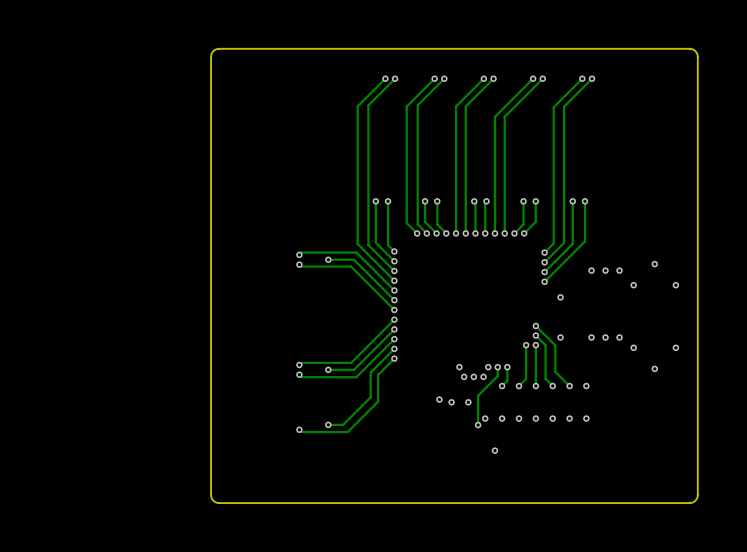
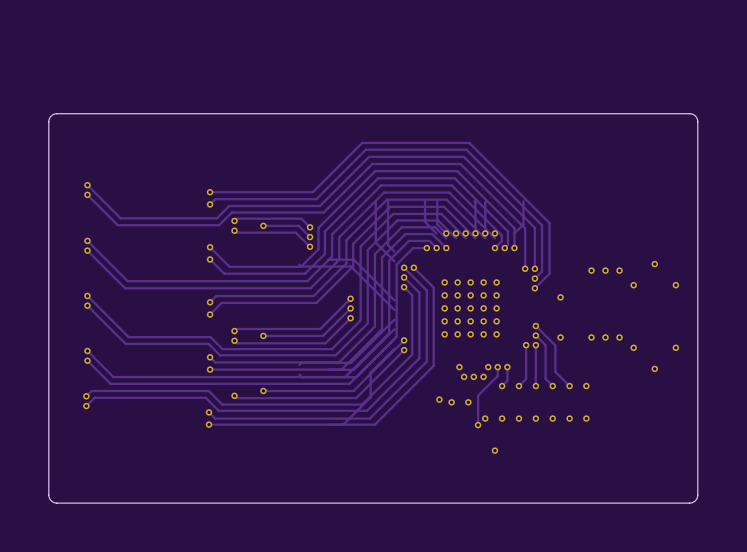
track: (385, 78) (357, 106) (357, 244) (394, 280) -> none
via: (385, 78) -> none
track: (395, 78) (368, 105) (368, 245) (394, 270) -> none
via: (395, 78) -> none
track: (434, 78) (406, 106) (406, 223) (417, 233) -> none
via: (434, 78) -> none
track: (444, 78) (417, 105) (417, 224) (426, 233) -> none
via: (444, 78) -> none
track: (483, 78) (456, 106) (456, 233) -> none
via: (483, 78) -> none
track: (493, 78) (465, 106) (465, 233) -> none
via: (493, 78) -> none
track: (533, 78) (494, 116) (494, 233) -> none
via: (533, 78) -> none
track: (542, 78) (504, 116) (505, 233) -> none
via: (542, 78) -> none
track: (582, 78) (553, 107) (553, 243) (544, 252) -> none
via: (582, 78) -> none
track: (592, 78) (564, 106) (564, 242) (544, 262) -> none
via: (592, 78) -> none
board edge: (697, 121) (697, 56) (695, 51) (690, 48) (219, 48) (214, 50) (211, 56) (211, 494) (213, 500) (219, 503) -> (697, 121) (695, 116) (689, 113) (56, 113) (51, 115) (48, 121) (49, 498) (56, 503) (219, 503)
track: none -> (87, 185) (120, 218) (216, 218) (229, 206) (319, 206) (369, 156) (463, 156) (534, 227) (534, 268)
via: none -> (87, 185)
track: none -> (210, 192) (312, 192) (362, 142) (469, 142) (549, 223) (549, 273) (534, 288)
via: none -> (210, 192)
track: none -> (87, 194) (117, 225) (219, 225) (231, 212) (323, 212) (372, 164) (460, 164) (525, 228) (525, 268)
via: none -> (87, 194)
via: (375, 201) -> none
via: (388, 201) -> none
via: (425, 201) -> none
via: (437, 201) -> none
via: (474, 201) -> none
via: (486, 201) -> none
via: (523, 201) -> none
track: (535, 201) (535, 221) (524, 233) -> none
via: (535, 201) -> none
track: (572, 201) (572, 243) (544, 272) -> none
via: (572, 201) -> none
track: (584, 201) (584, 241) (544, 281) -> none
via: (584, 201) -> none
track: none -> (210, 204) (215, 199) (316, 199) (365, 149) (466, 149) (542, 225) (542, 271) (534, 278)
via: none -> (210, 204)
track: none -> (234, 220) (236, 218) (301, 218) (310, 227)
via: none -> (234, 220)
track: none -> (263, 225) (298, 225) (310, 237)
via: none -> (263, 225)
via: none -> (310, 227)
track: none -> (234, 230) (236, 232) (295, 232) (310, 246)
via: none -> (234, 230)
via: (417, 233) -> none
via: (426, 233) -> none
via: (436, 233) -> none
via: (504, 233) -> none
via: (514, 233) -> none
via: (524, 233) -> none
via: none -> (310, 237)
track: none -> (446, 238) (435, 227) (401, 227) (374, 254) (374, 326) (339, 362) (215, 362) (210, 357)
track: none -> (456, 238) (438, 220) (397, 220) (367, 249) (367, 323) (335, 355) (219, 355) (208, 343) (125, 343) (87, 305)
track: none -> (465, 238) (441, 213) (393, 213) (360, 246) (360, 320) (331, 349) (222, 349) (210, 337) (128, 337) (87, 295)
track: none -> (475, 238) (444, 206) (390, 206) (353, 243) (353, 266) (316, 302) (221, 302) (210, 314)
track: none -> (485, 238) (446, 199) (386, 199) (346, 240) (346, 263) (313, 296) (216, 296) (210, 302)
track: none -> (494, 238) (449, 192) (384, 192) (339, 237) (339, 259) (310, 288) (125, 288) (87, 250)
track: none -> (87, 240) (127, 281) (307, 281) (332, 256) (332, 234) (381, 185) (451, 185) (501, 235) (501, 241) (494, 248)
via: none -> (87, 240)
via: none -> (310, 246)
track: none -> (210, 247) (229, 266) (300, 266) (318, 249) (318, 227) (375, 171) (457, 171) (514, 228) (514, 248)
via: none -> (210, 247)
track: none -> (426, 248) (413, 248) (396, 264) (396, 336) (349, 383) (110, 383) (87, 360)
via: none -> (426, 248)
track: none -> (436, 248) (429, 240) (409, 240) (389, 260) (389, 333) (345, 377) (113, 377) (87, 351)
via: none -> (436, 248)
track: none -> (446, 248) (432, 234) (405, 234) (382, 257) (382, 329) (341, 369) (210, 369)
via: none -> (446, 248)
via: none -> (494, 248)
track: none -> (504, 248) (507, 244) (507, 231) (454, 178) (378, 178) (324, 231) (324, 253) (305, 273) (224, 273) (210, 259)
via: none -> (504, 248)
via: none -> (514, 248)
via: none -> (87, 250)
via: (394, 251) -> none
via: (544, 252) -> none
track: (299, 254) (301, 252) (356, 252) (394, 290) -> none
via: (299, 254) -> none
via: none -> (210, 259)
via: (328, 259) -> none
via: (394, 261) -> none
via: (544, 262) -> none
via: (299, 264) -> none
track: none -> (404, 267) (426, 290) (426, 361) (369, 418) (215, 418) (208, 412)
via: none -> (404, 267)
track: none -> (413, 267) (433, 287) (433, 365) (374, 424) (208, 424)
via: none -> (413, 267)
via: none -> (525, 268)
via: none -> (534, 268)
via: (394, 270) -> none
via: (544, 272) -> none
track: none -> (404, 277) (419, 292) (419, 358) (366, 410) (218, 410) (205, 397) (94, 397) (86, 406)
via: none -> (404, 277)
via: none -> (534, 278)
via: (394, 280) -> none
via: (544, 281) -> none
via: none -> (444, 282)
via: none -> (457, 282)
via: none -> (470, 282)
via: none -> (483, 282)
via: none -> (496, 282)
track: none -> (404, 287) (412, 295) (412, 354) (362, 404) (222, 404) (208, 390) (91, 390) (86, 396)
via: none -> (404, 287)
via: none -> (534, 288)
via: (394, 290) -> none
via: none -> (87, 295)
via: none -> (444, 295)
via: none -> (457, 295)
via: none -> (470, 295)
via: none -> (483, 295)
via: none -> (496, 295)
track: none -> (350, 298) (320, 329) (236, 329) (234, 331)
via: none -> (350, 298)
via: (394, 300) -> none
via: none -> (210, 302)
via: none -> (87, 305)
track: none -> (350, 308) (323, 335) (263, 335)
via: none -> (350, 308)
via: none -> (444, 308)
via: none -> (457, 308)
via: none -> (470, 308)
via: none -> (483, 308)
via: none -> (496, 308)
via: (394, 309) -> none
via: none -> (210, 314)
track: none -> (350, 318) (325, 343) (237, 343) (234, 340)
via: none -> (350, 318)
via: (394, 319) -> none
via: none -> (444, 321)
via: none -> (457, 321)
via: none -> (470, 321)
via: none -> (483, 321)
via: none -> (496, 321)
via: (394, 329) -> none
via: none -> (234, 331)
via: none -> (444, 334)
via: none -> (457, 334)
via: none -> (470, 334)
via: none -> (483, 334)
via: none -> (496, 334)
via: none -> (263, 335)
via: (394, 339) -> none
via: none -> (234, 340)
track: none -> (404, 340) (353, 390) (263, 390)
via: none -> (404, 340)
via: (394, 348) -> none
track: none -> (404, 350) (356, 398) (236, 398) (234, 395)
via: none -> (404, 350)
via: none -> (87, 351)
via: none -> (210, 357)
track: (394, 358) (378, 374) (378, 401) (347, 432) (301, 432) (299, 429) -> none
via: (394, 358) -> none
via: none -> (87, 360)
via: (299, 364) -> none
via: none -> (210, 369)
via: (328, 369) -> none
via: (299, 374) -> none
via: none -> (263, 390)
via: none -> (234, 395)
via: none -> (86, 396)
via: none -> (86, 406)
via: none -> (208, 412)
via: none -> (208, 424)
via: (328, 424) -> none
via: (299, 429) -> none

